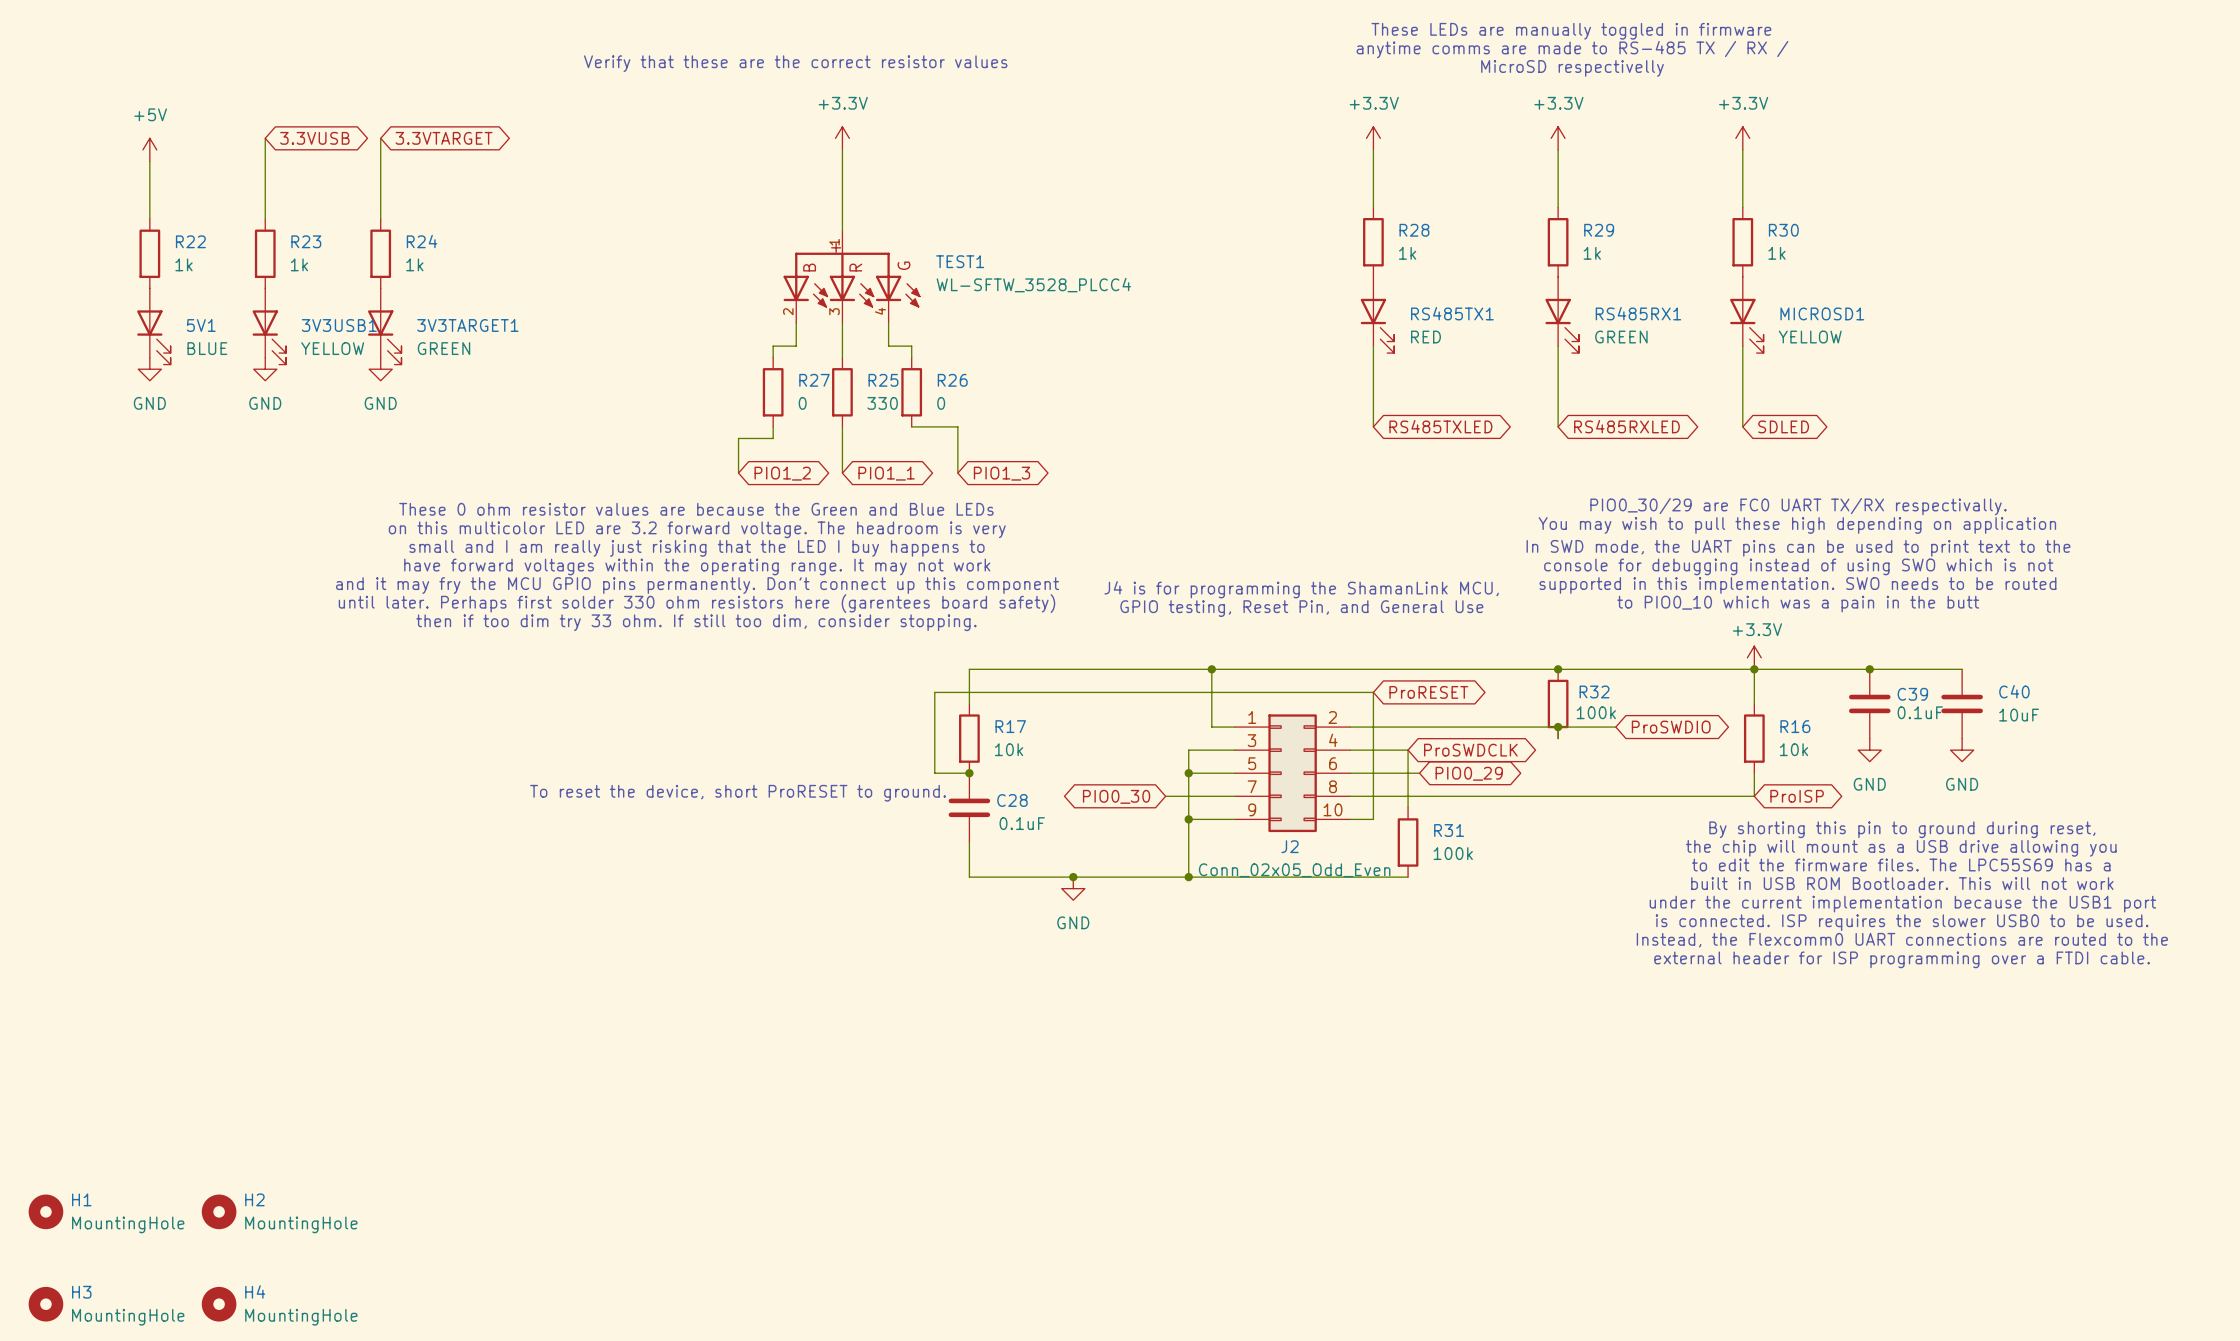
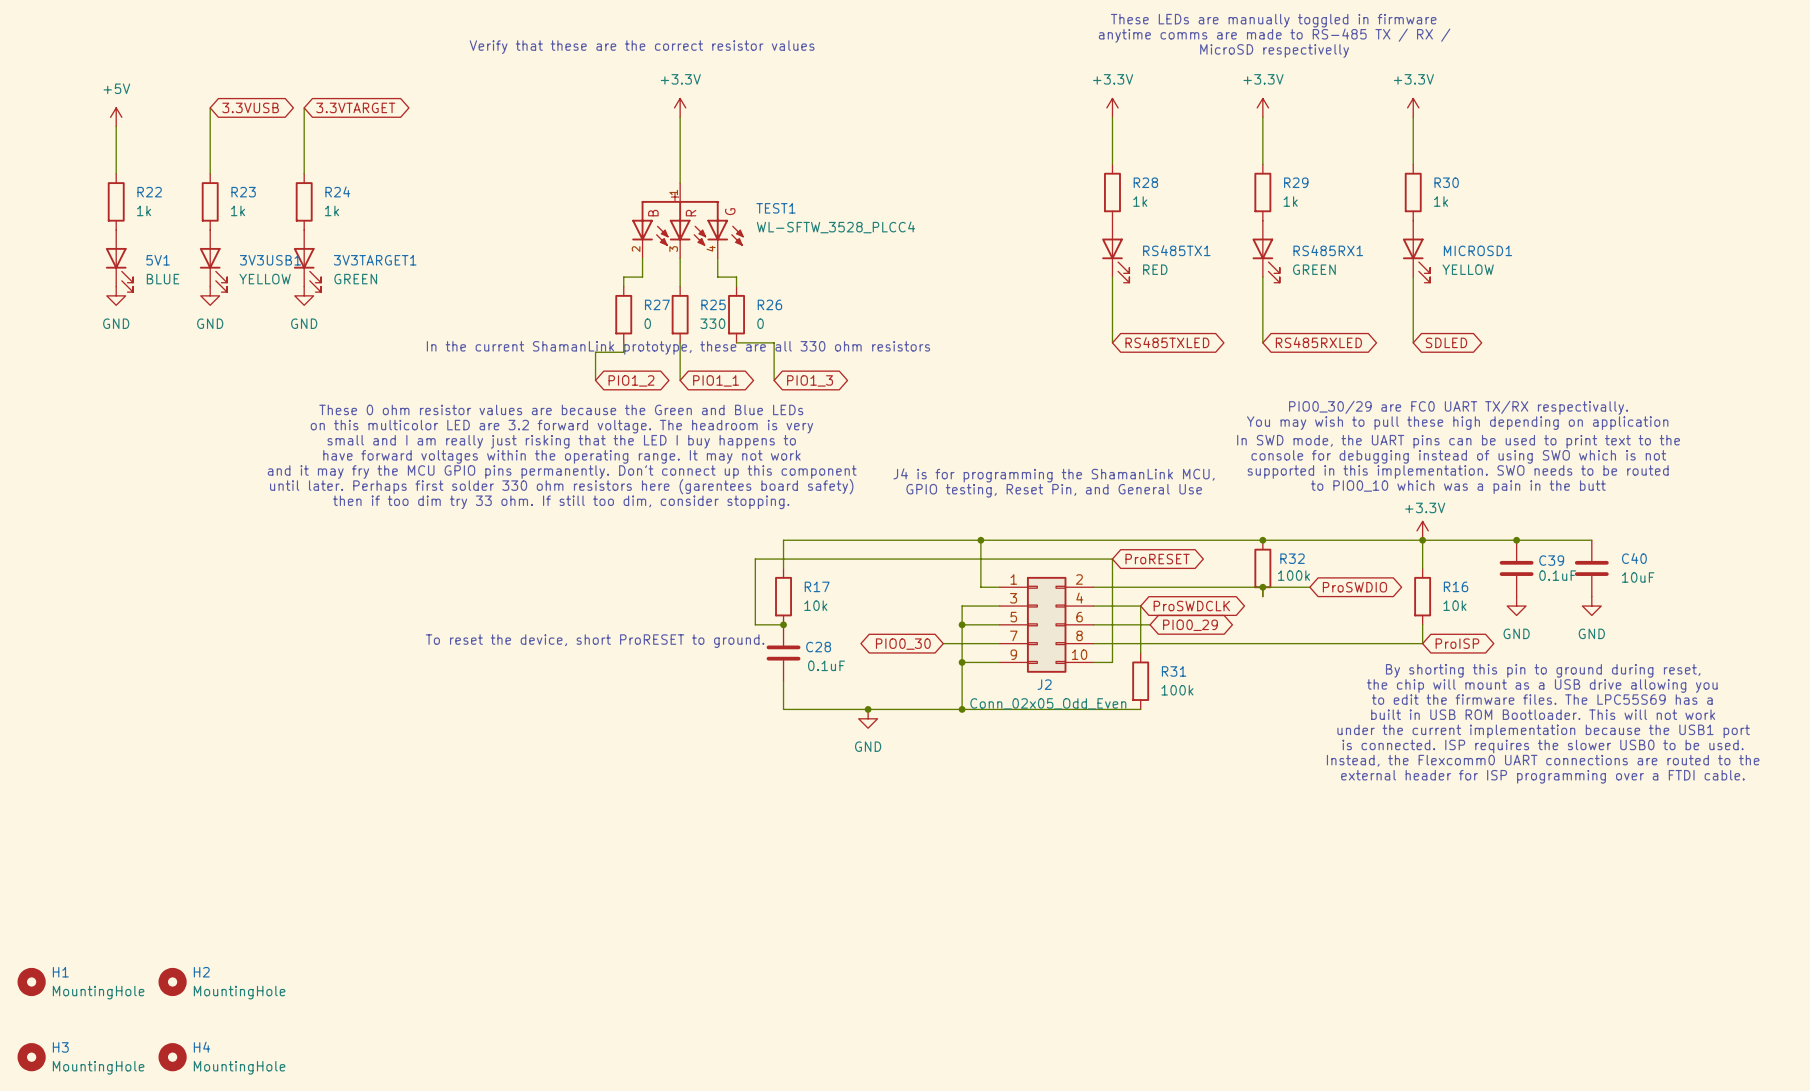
text: none -> In the current ShamanLink prototype, these are all 330 ohm resistors (678, 347)

